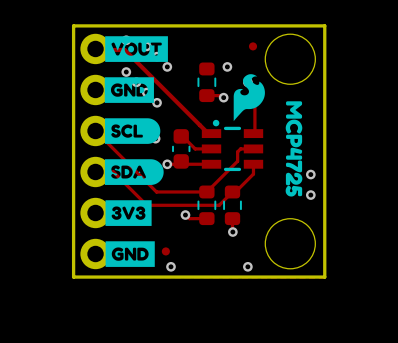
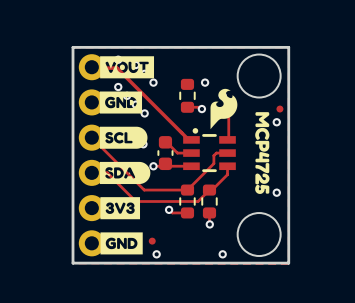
part position: (253, 46) -> (279, 109)
via position: (310, 174) -> (276, 122)

